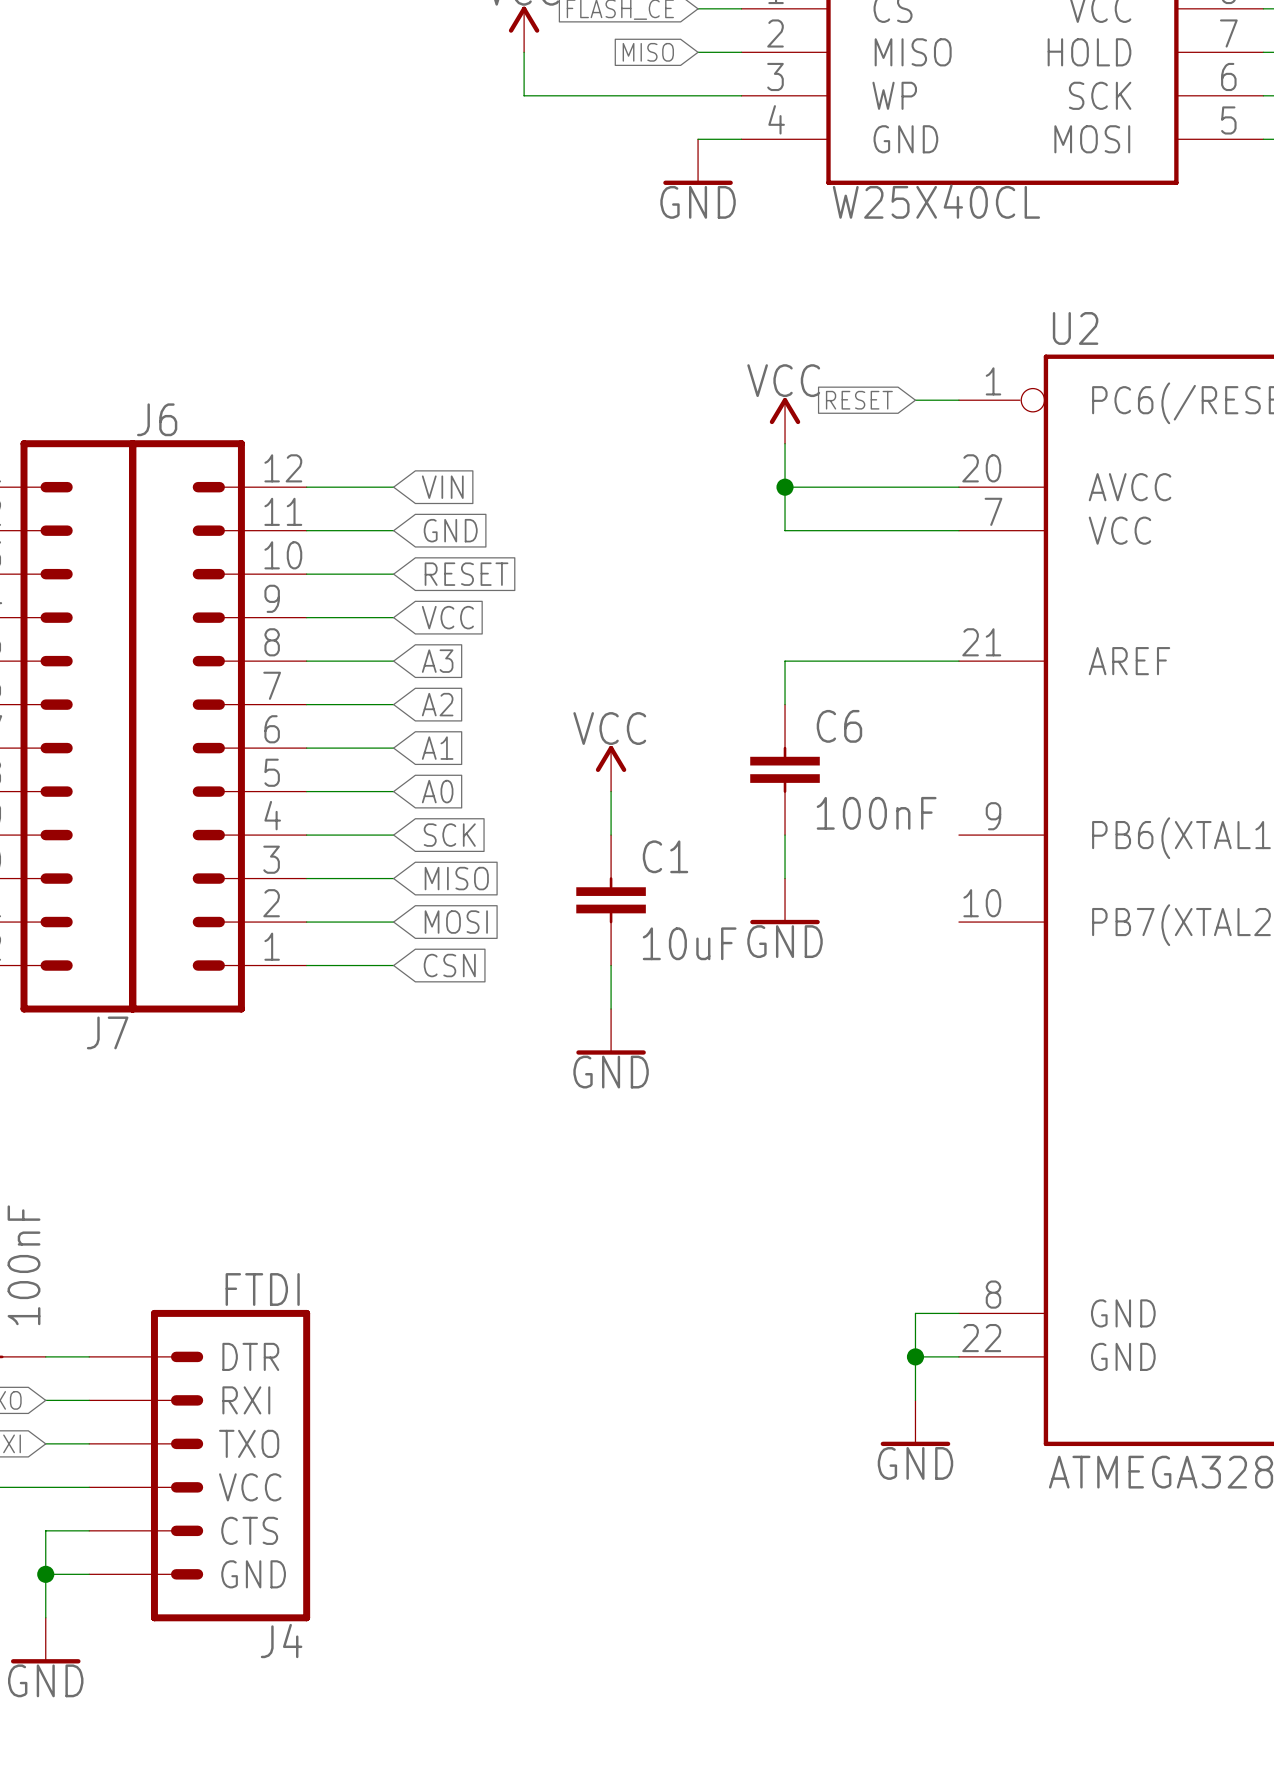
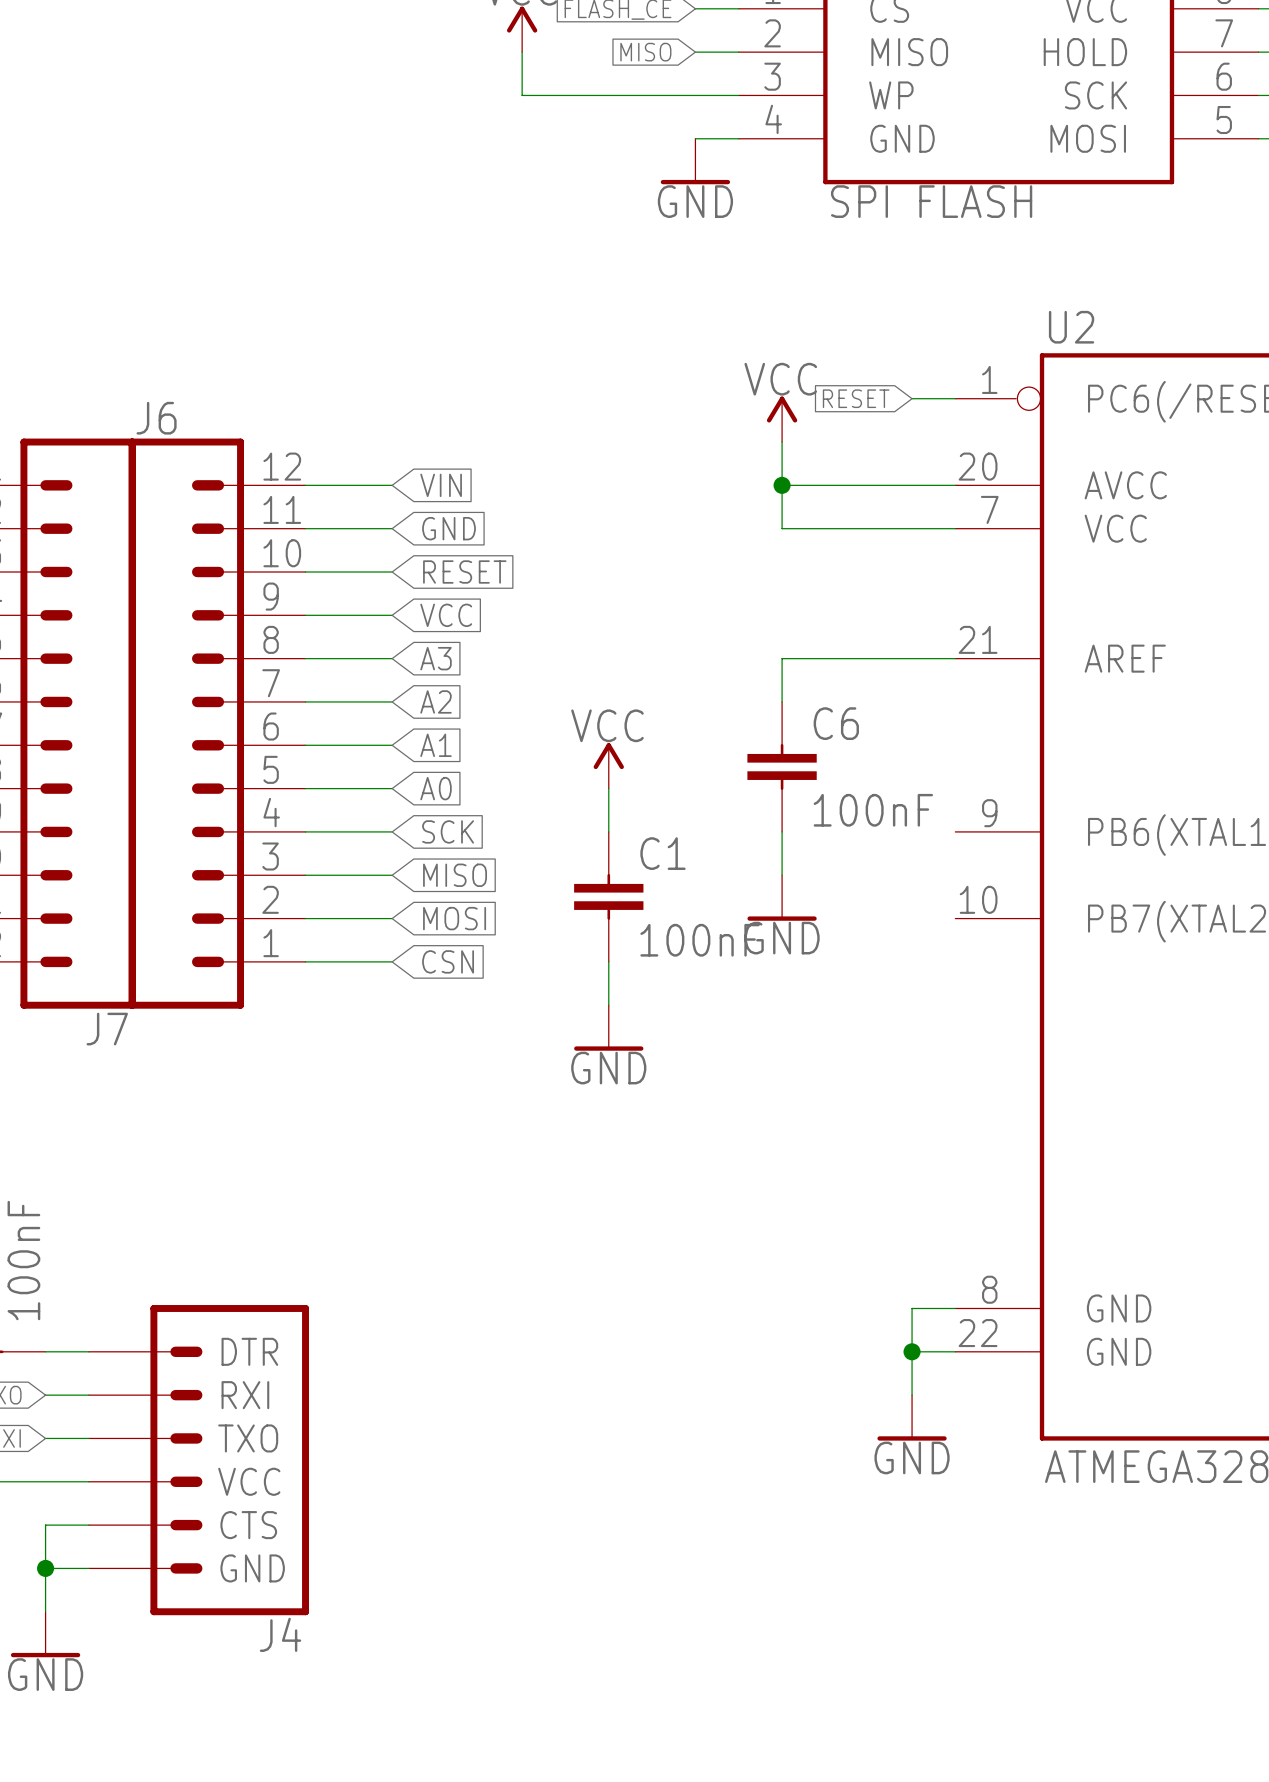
part value: W25X40CL (936, 201) -> SPI FLASH (931, 201)
C1 value: 10uF (689, 943) -> 100nF (700, 940)
J4 value: FTDI (262, 1289) -> none

